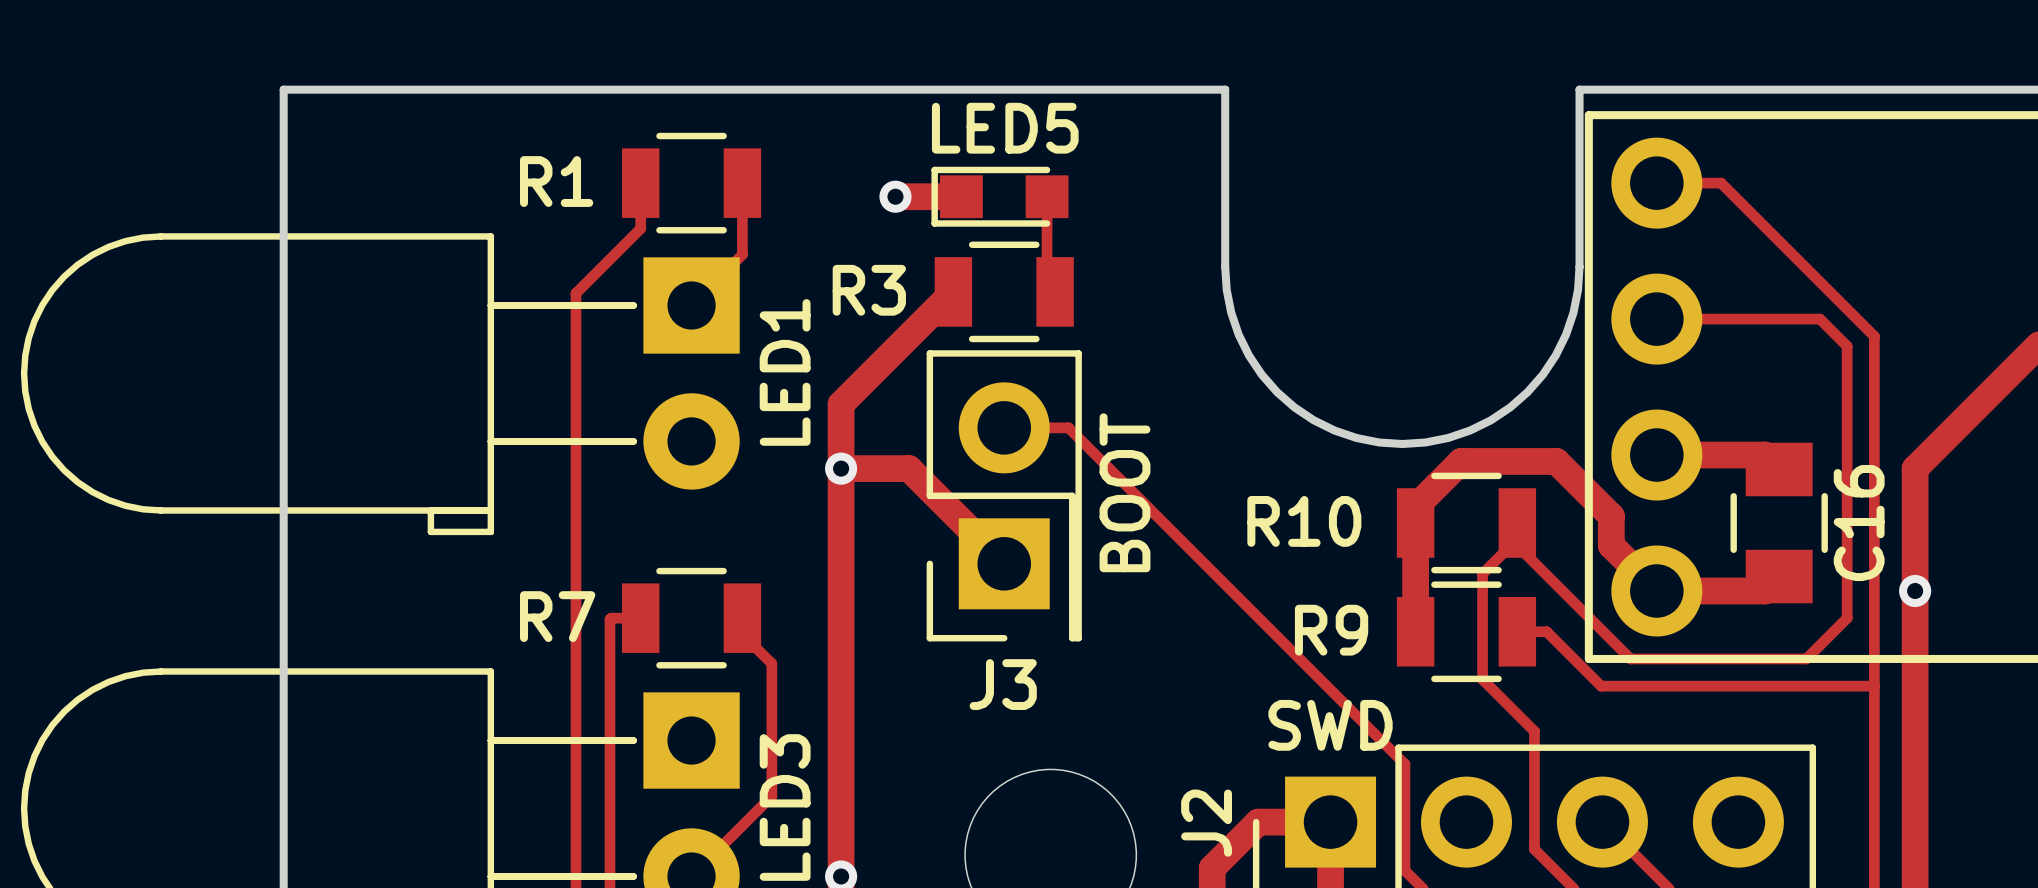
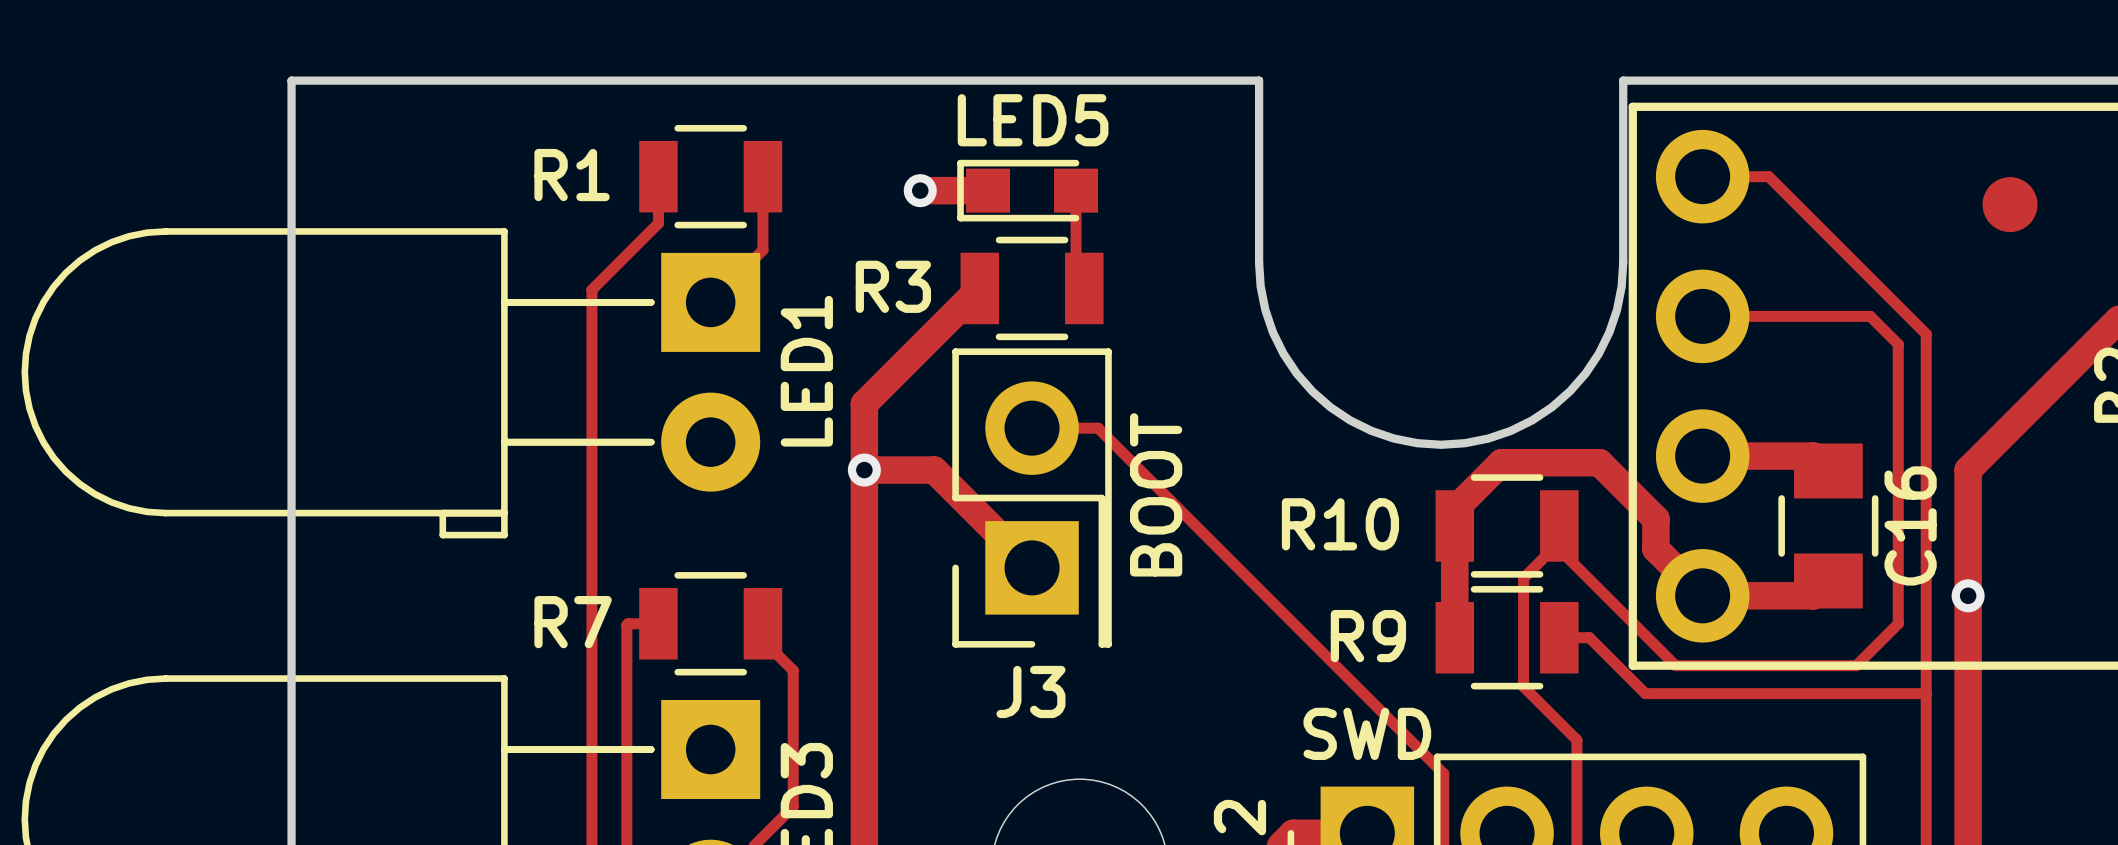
part: none -> (2010, 204)

